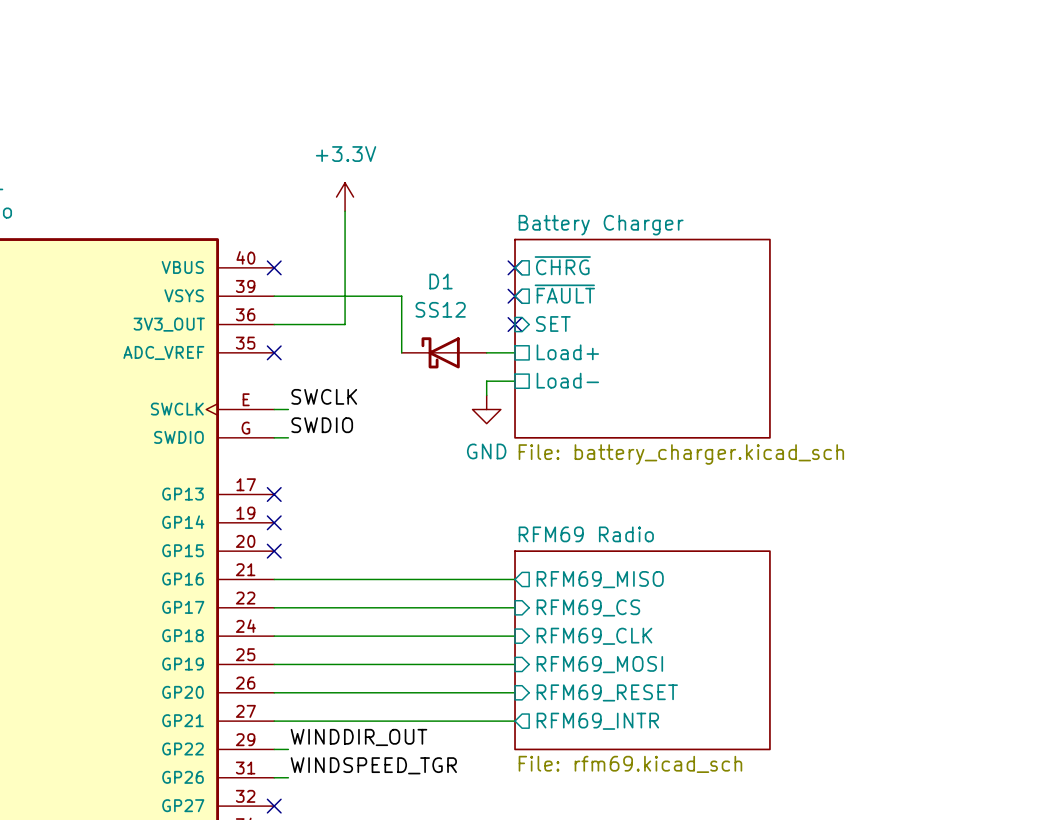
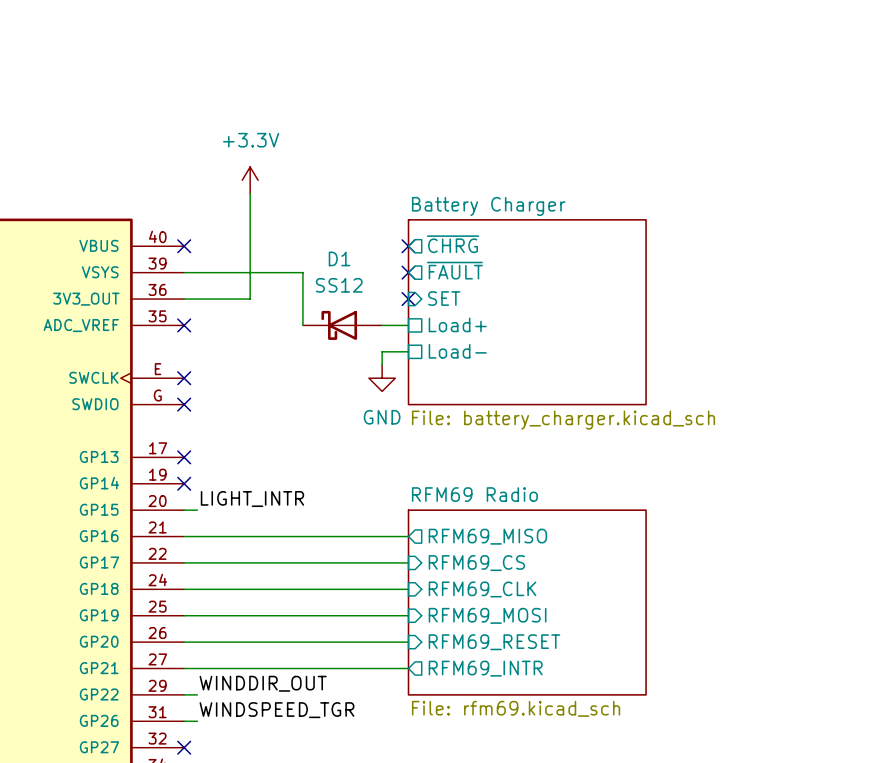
label: SWCLK (324, 396) -> none
wire: (274, 409) (288, 409) -> none
no-connect mark: none -> (184, 378)
label: SWDIO (322, 425) -> none
wire: (274, 437) (288, 437) -> (184, 510) (197, 510)
no-connect mark: none -> (184, 404)
label: none -> LIGHT_INTR (252, 499)
no-connect mark: (274, 551) -> none

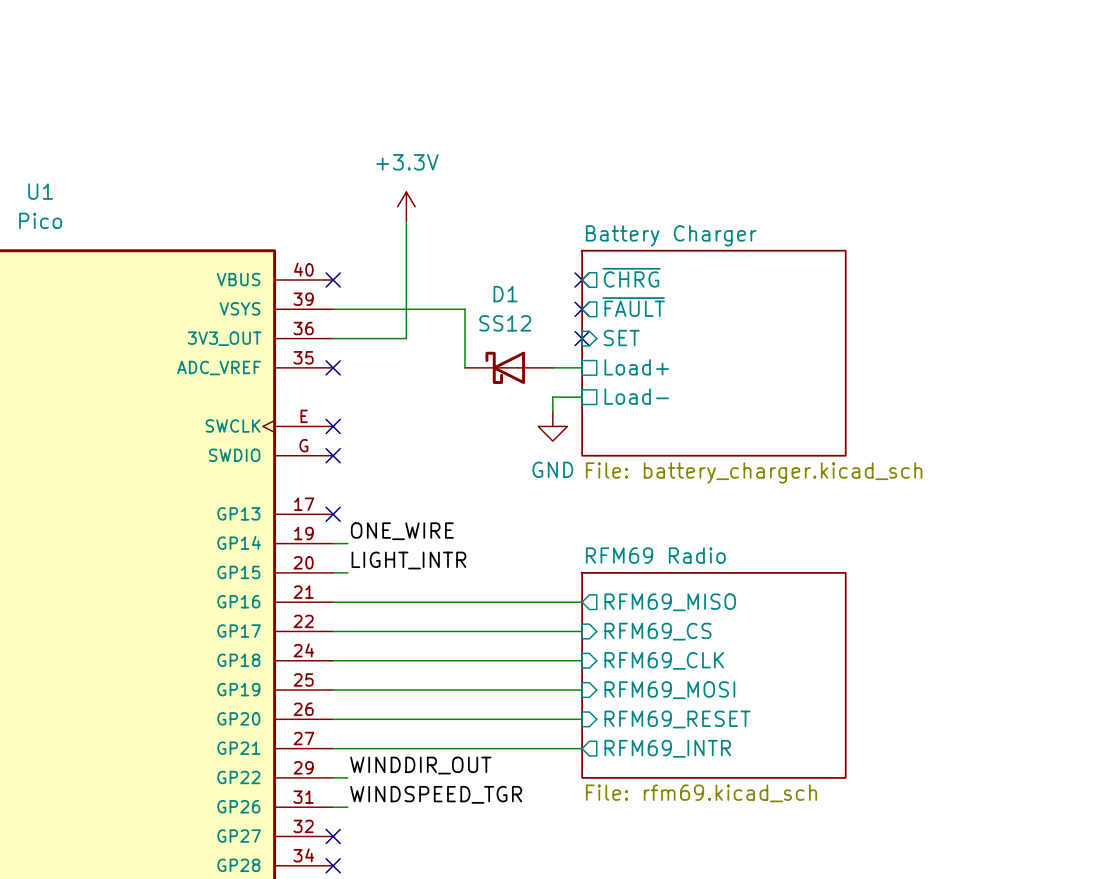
label: none -> ONE_WIRE (402, 531)
wire: none -> (333, 543) (347, 543)
no-connect mark: (184, 483) -> none

